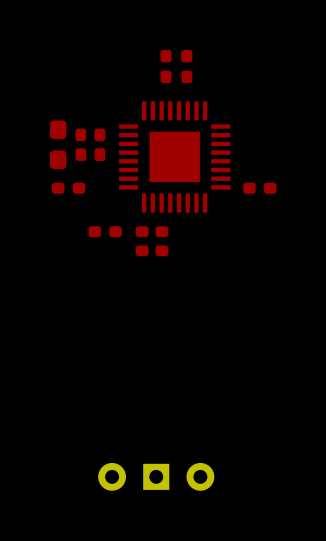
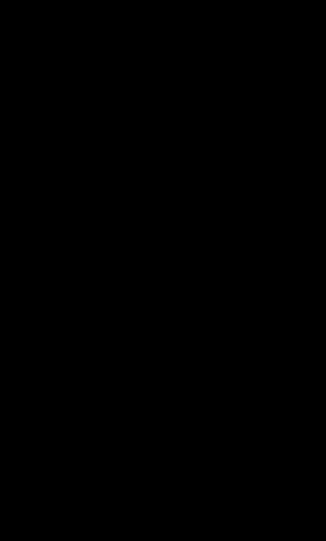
part: (165, 66) -> none
part: (186, 66) -> none
part: (58, 144) -> none
part: (80, 144) -> none
part: (99, 144) -> none
part: (174, 156) -> none
part: (68, 188) -> none
part: (259, 188) -> none
part: (105, 231) -> none
part: (152, 231) -> none
part: (152, 250) -> none
part: (156, 476) -> none

